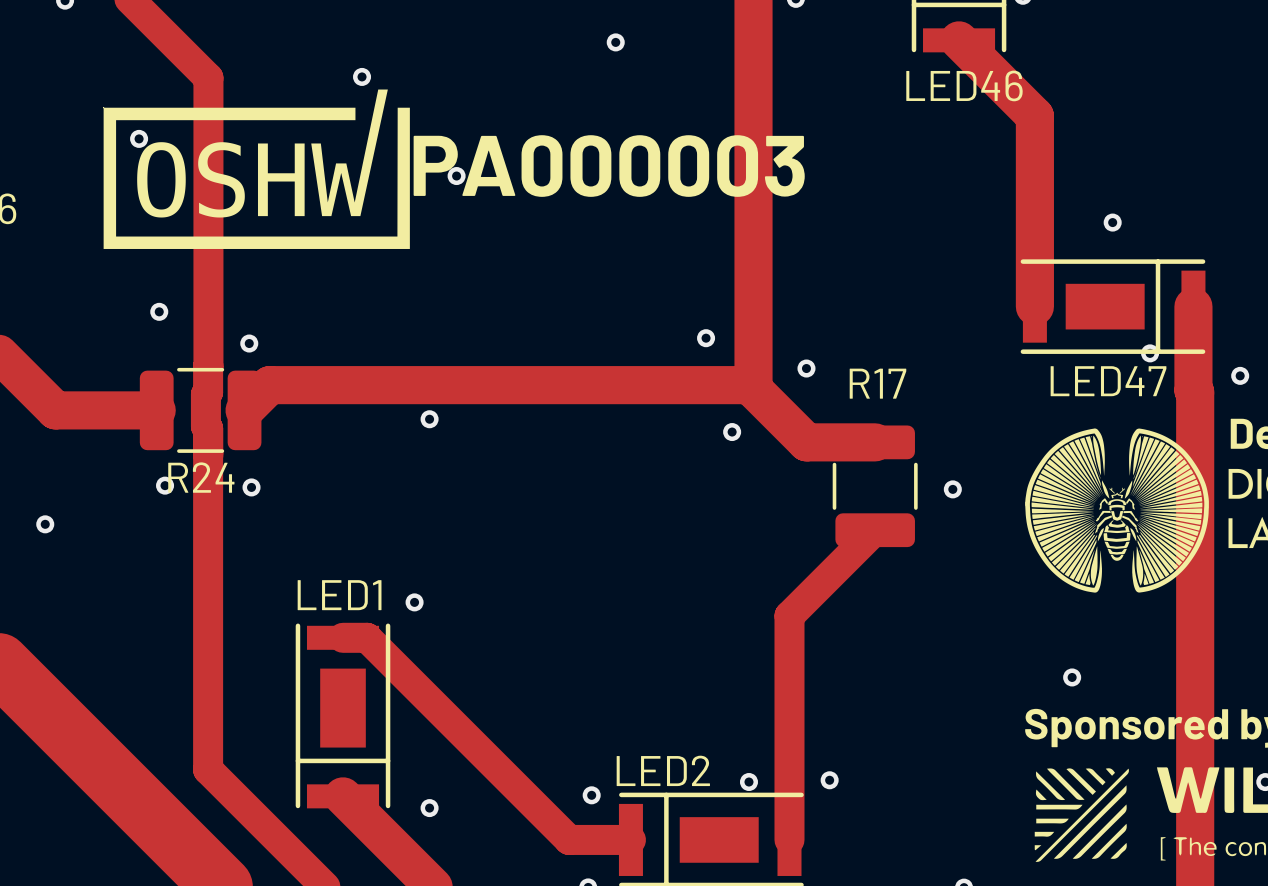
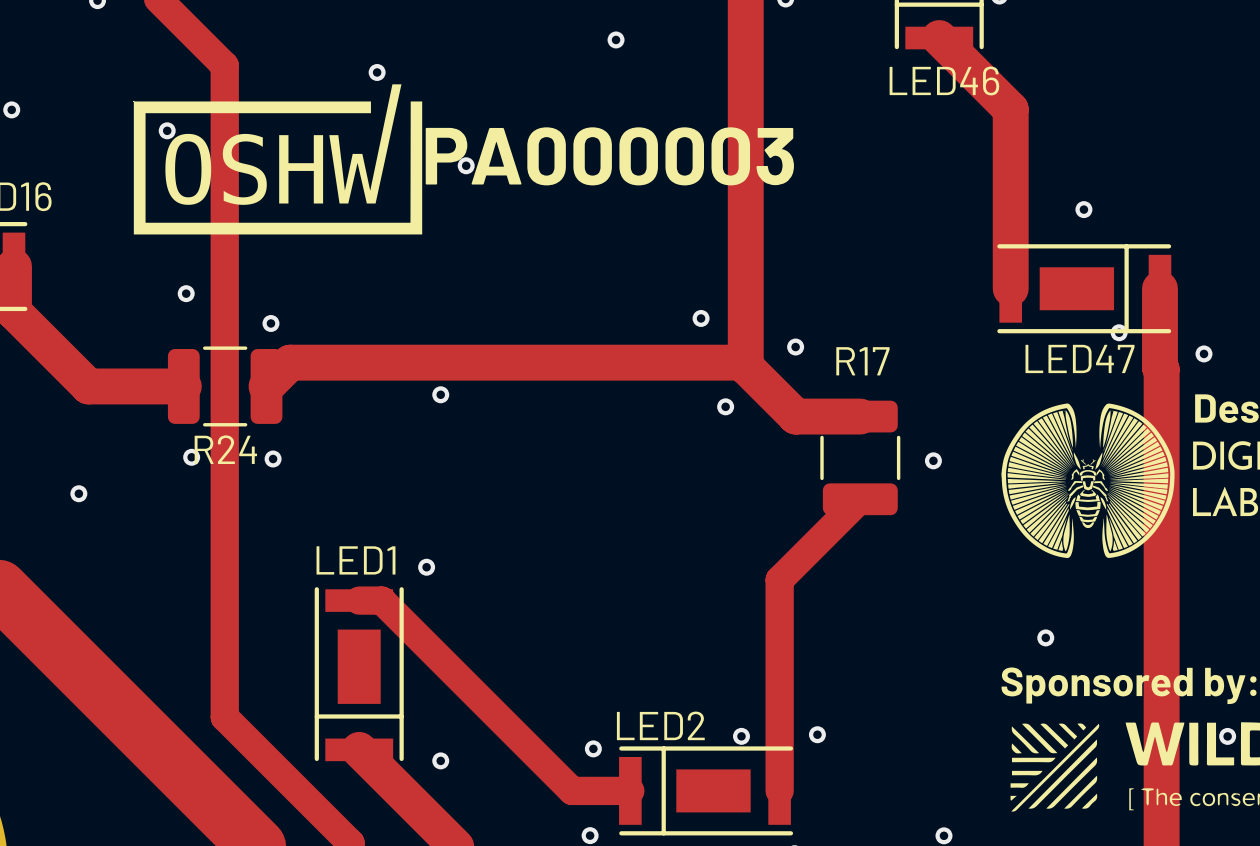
top track: (200, 69) (208, 77) (208, 366) -> none
top track: (208, 366) (208, 392) (205, 394) (205, 426) (208, 428) (208, 769) -> (224, 65) (224, 717) (232, 724)

